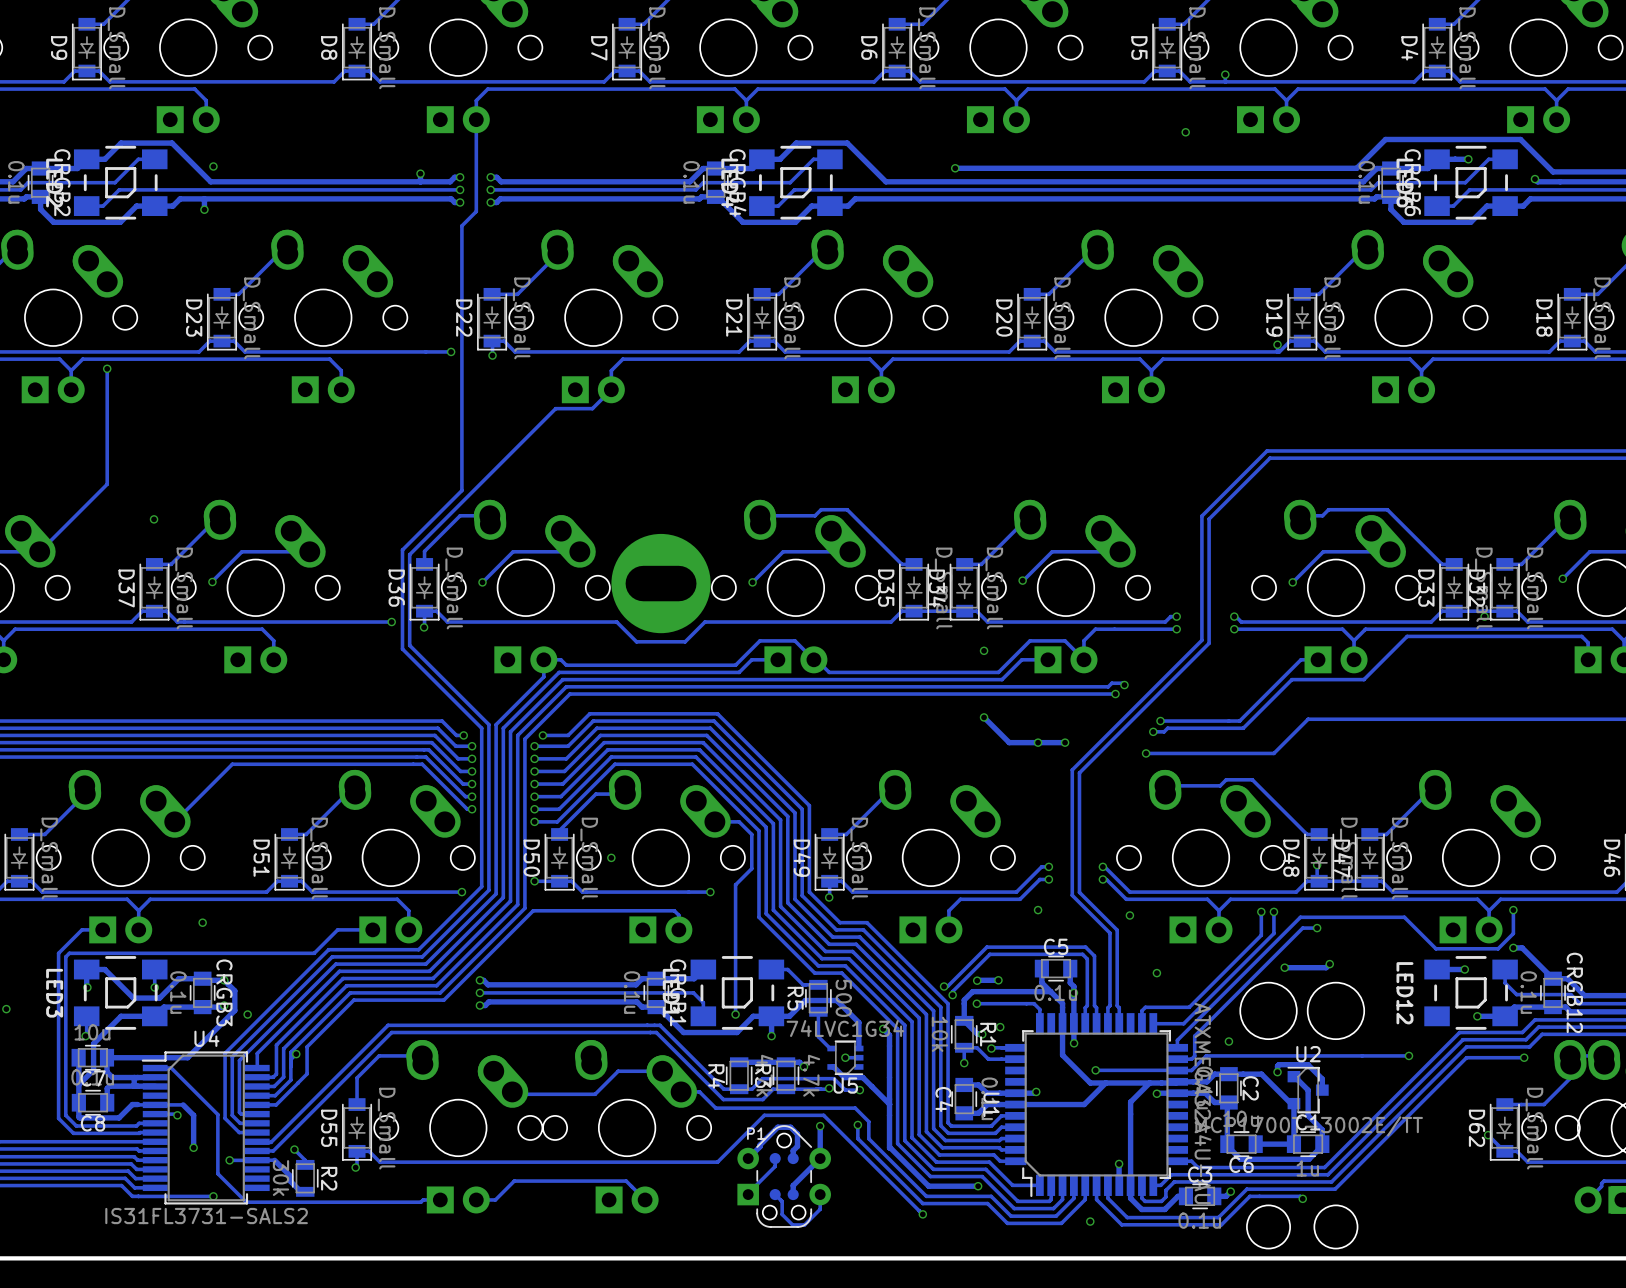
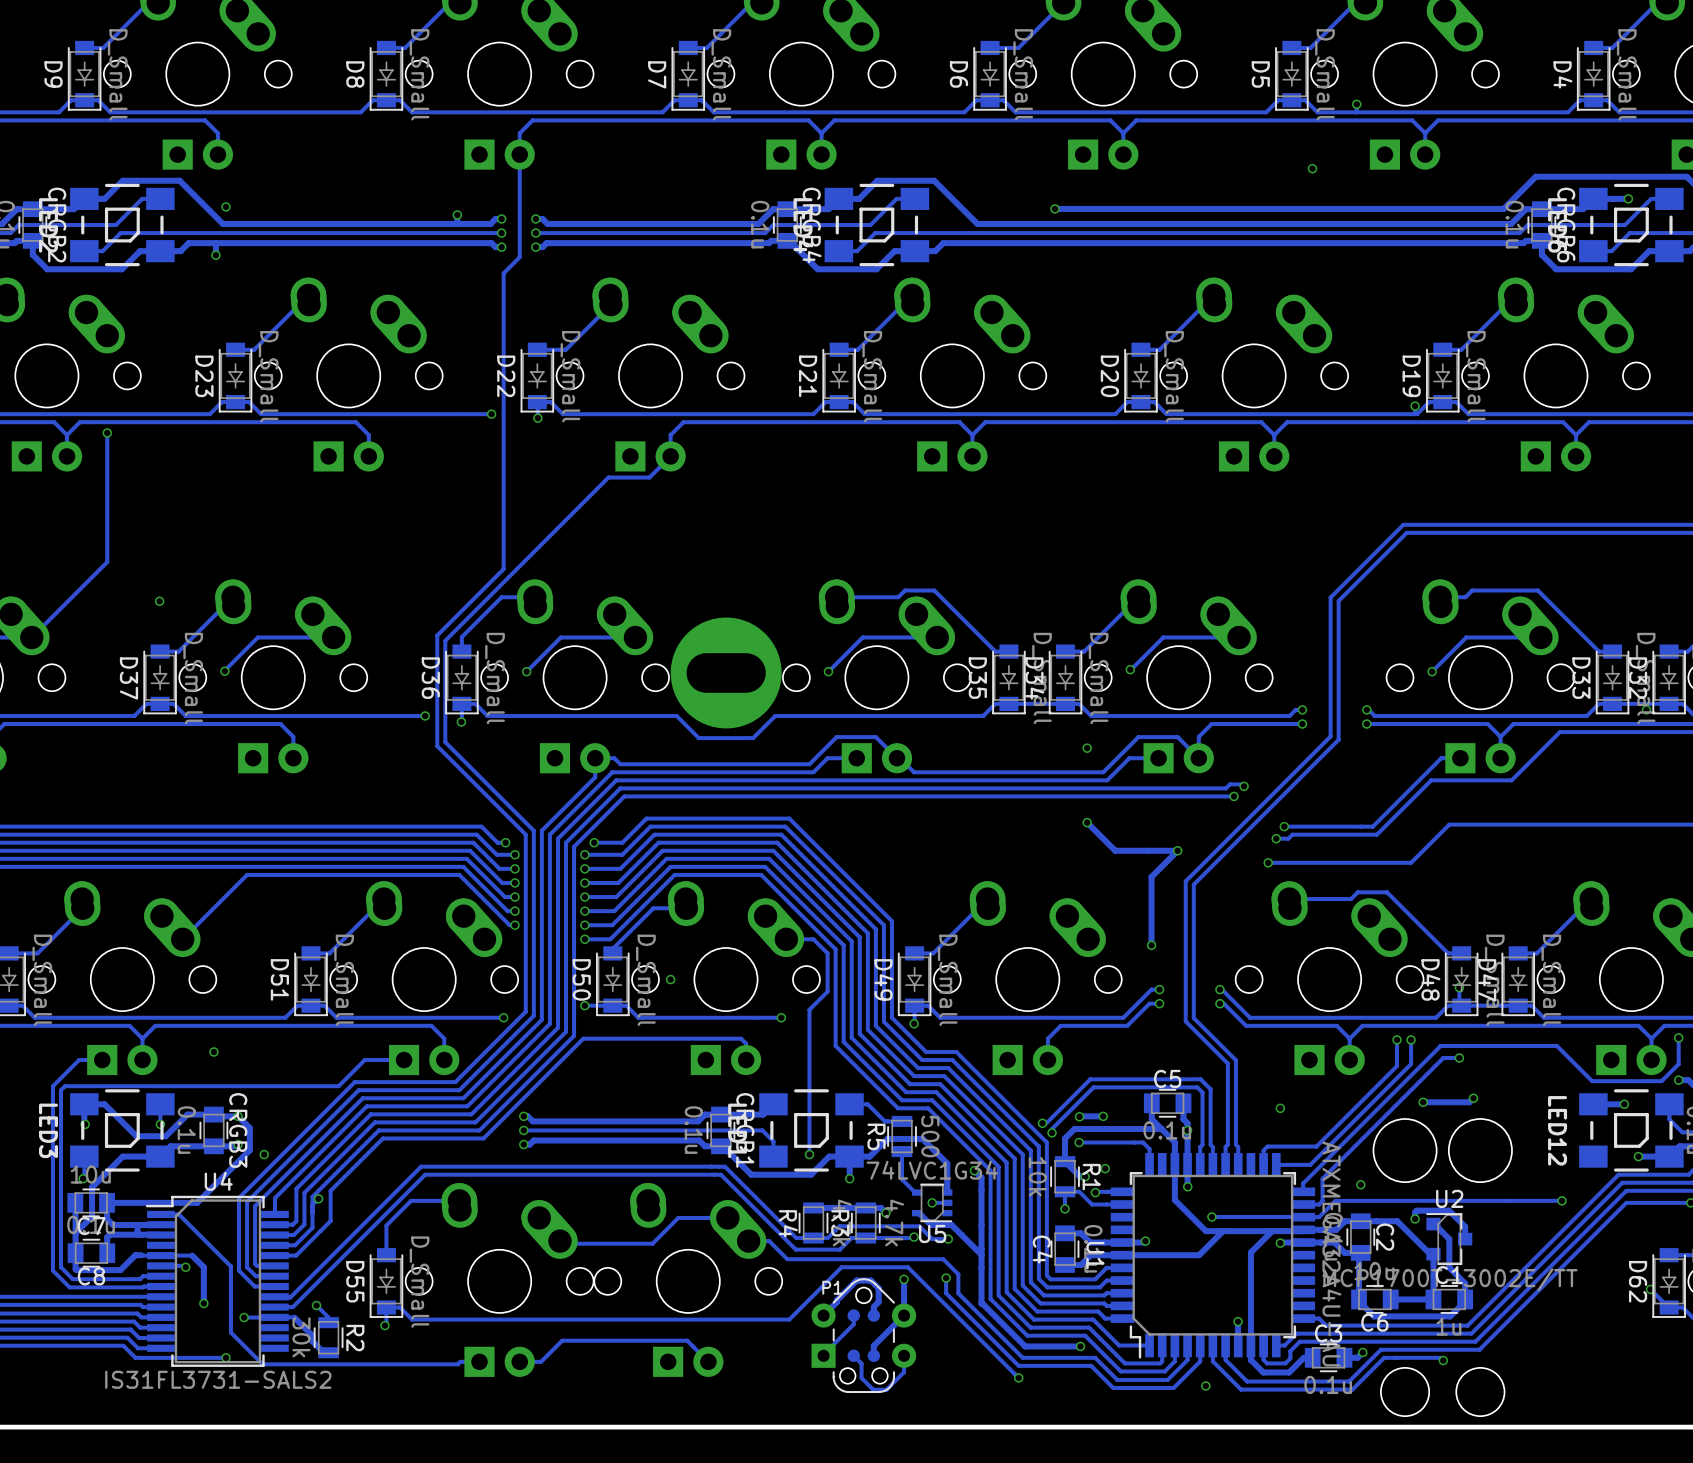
via: (1038, 742) -> none
track: none -> (1177, 850) (1151, 876) (1151, 945)
via: none -> (1151, 945)
via: (1038, 910) -> none
via: (1129, 915) -> none

